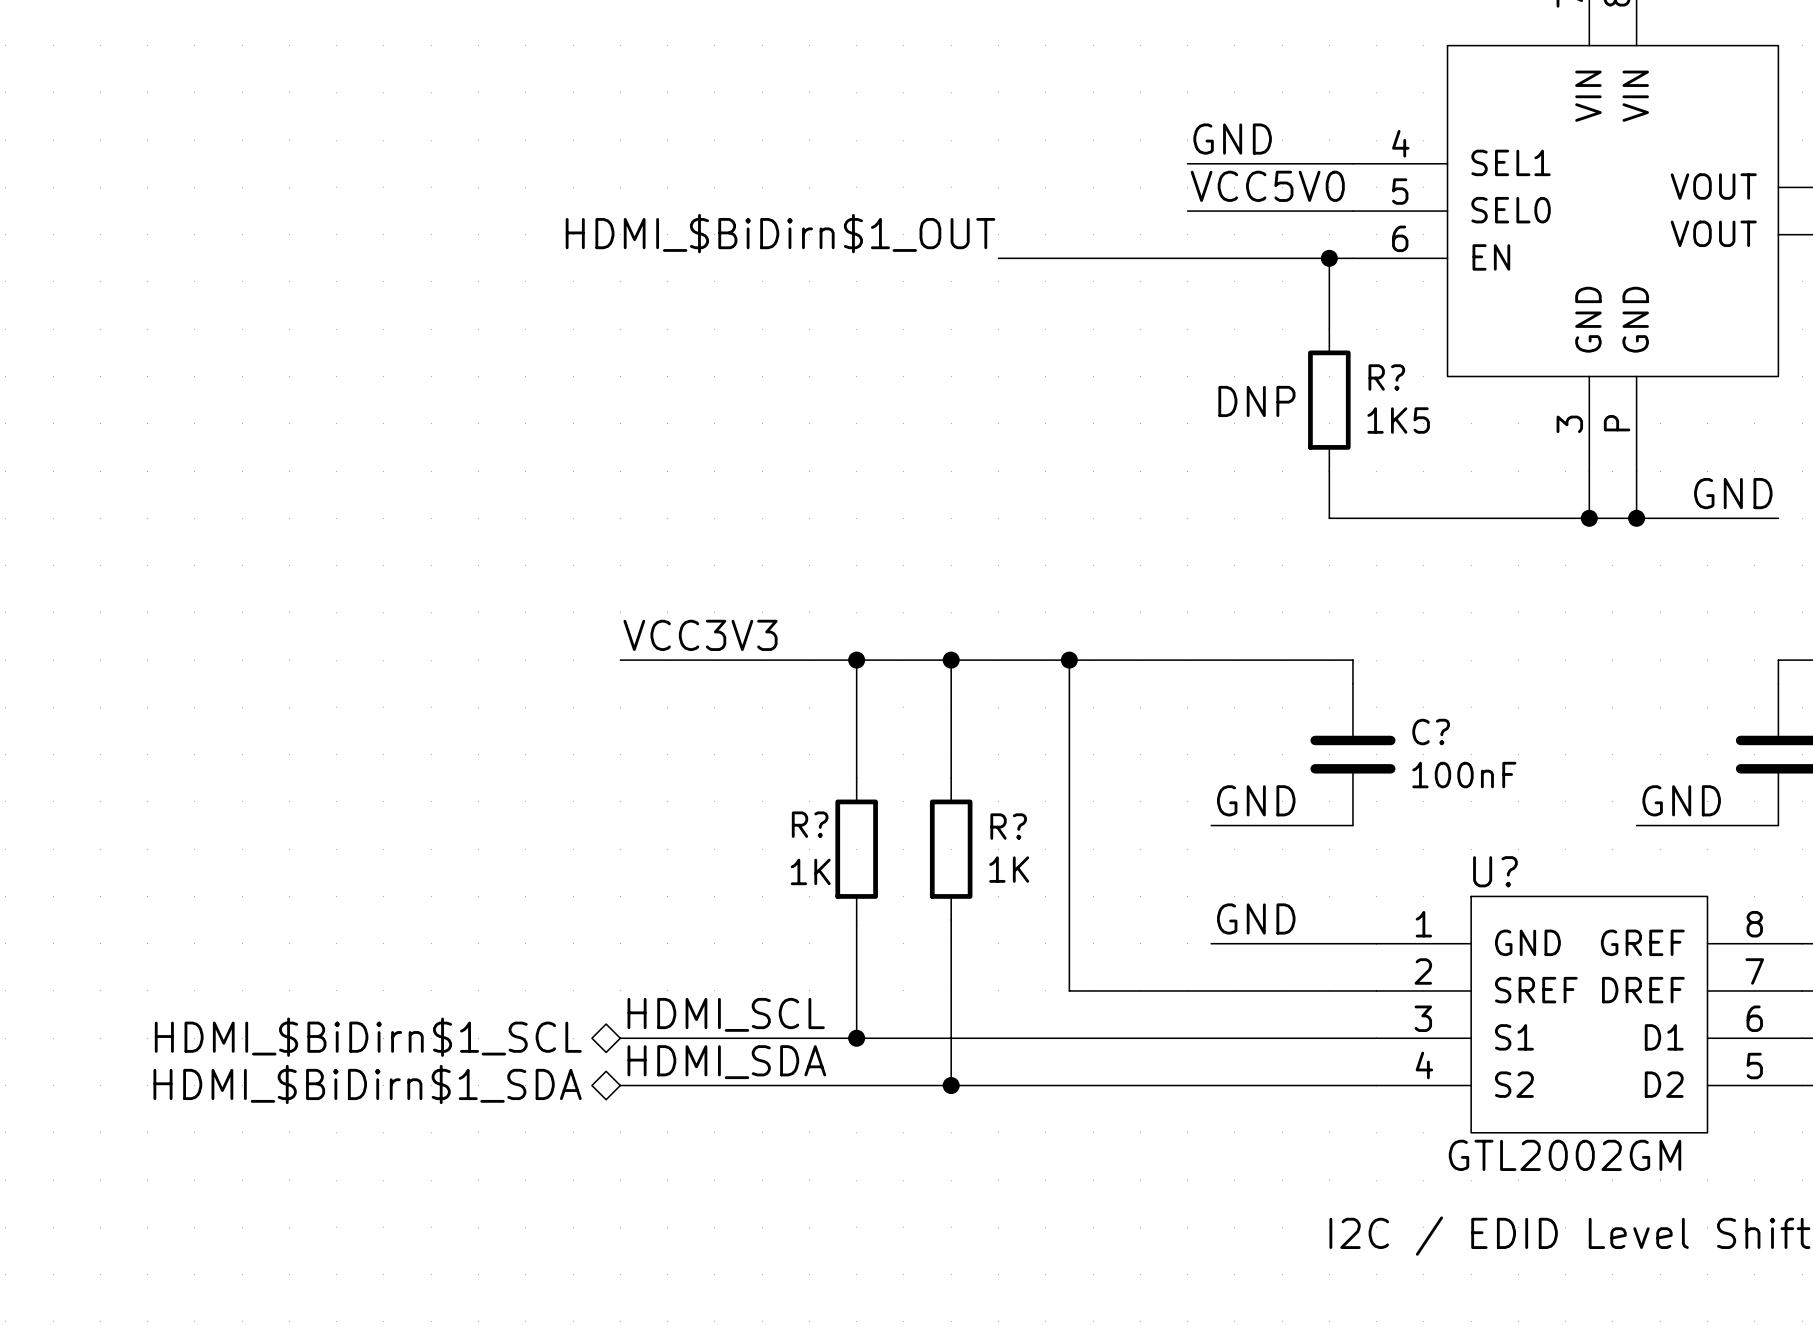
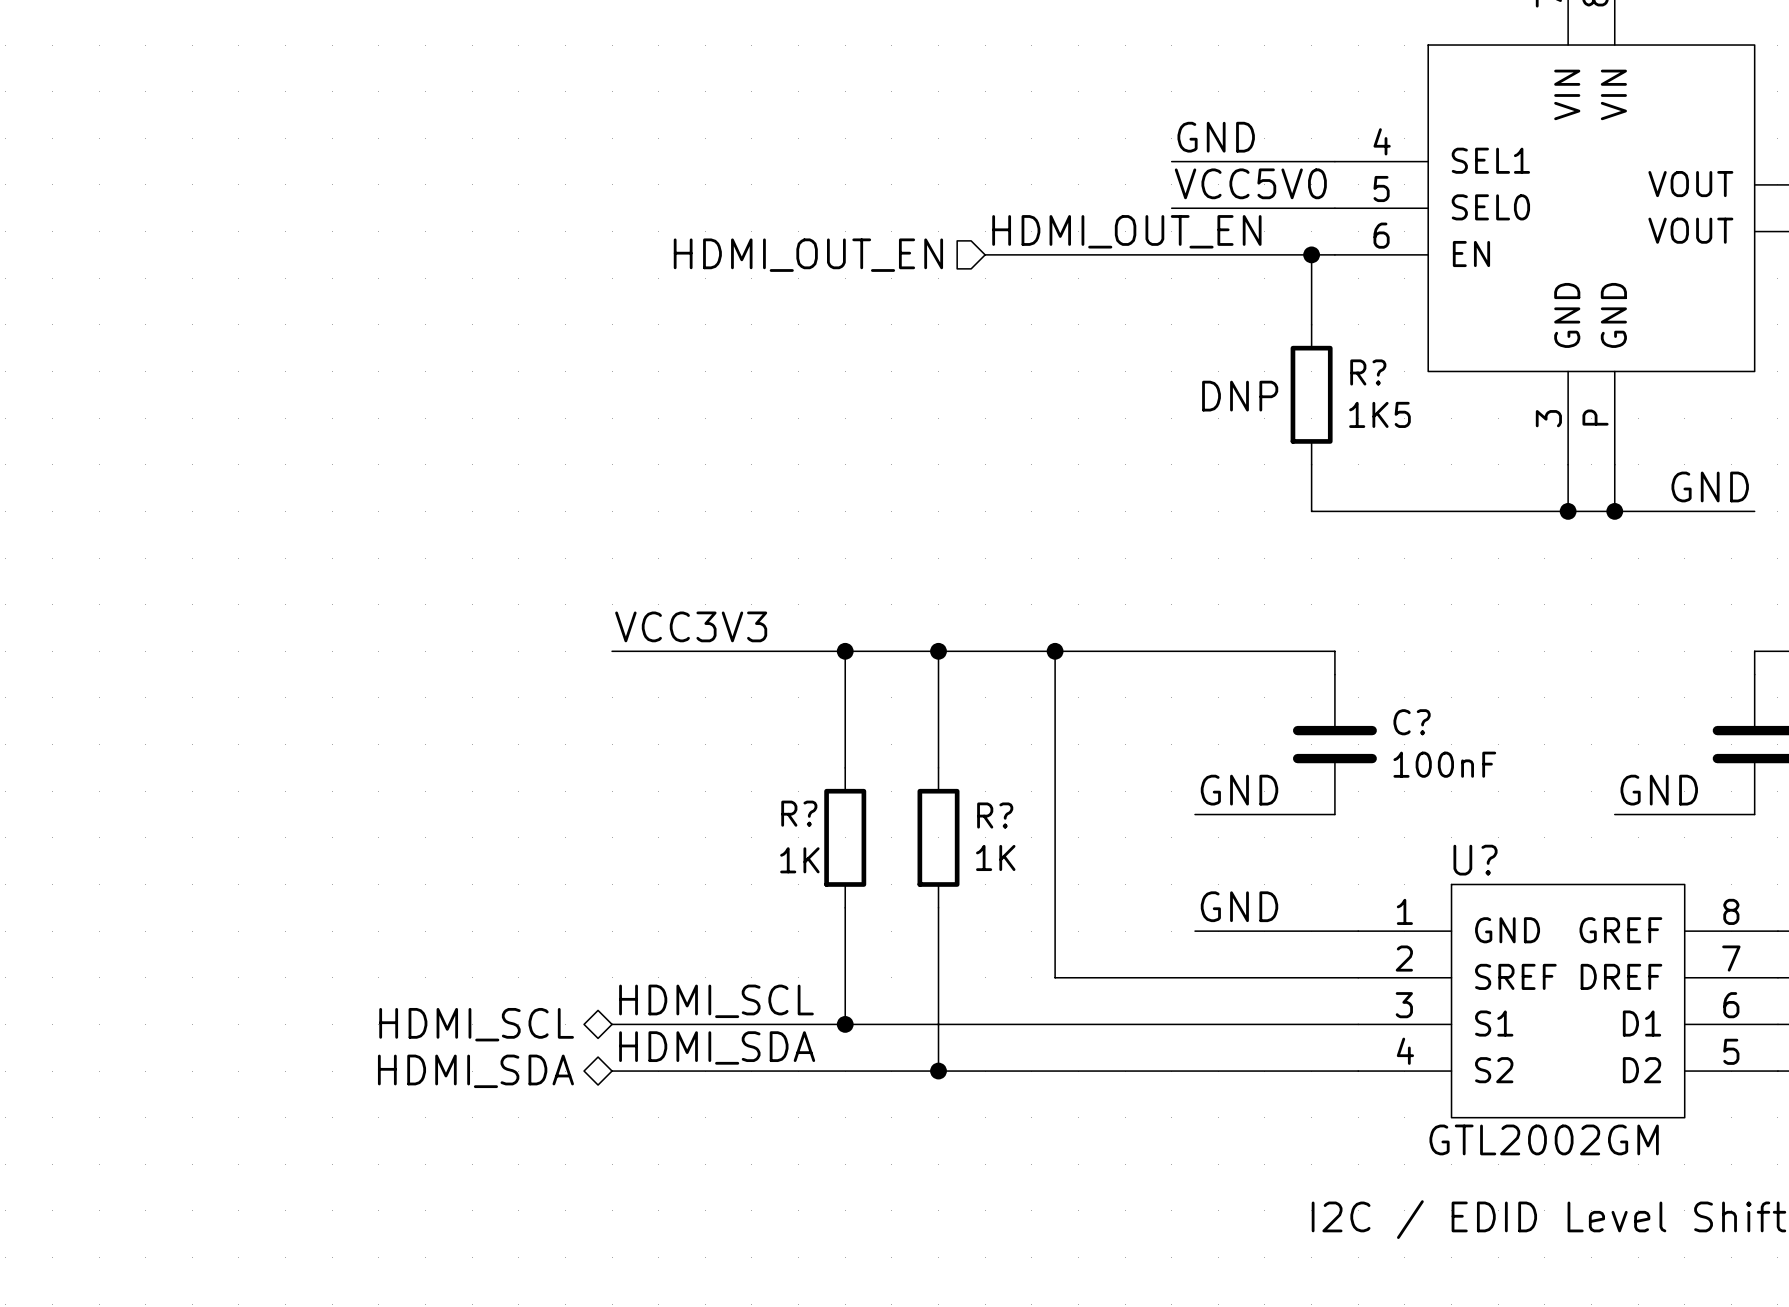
label: HDMI_$BiDirn$1_OUT (780, 233) -> HDMI_OUT_EN (1126, 231)
hierarchical label: none -> HDMI_OUT_EN (808, 255)
hierarchical label: HDMI_$BiDirn$1_SCL (368, 1037) -> HDMI_SCL (476, 1024)
hierarchical label: HDMI_$BiDirn$1_SDA (367, 1084) -> HDMI_SDA (475, 1071)

